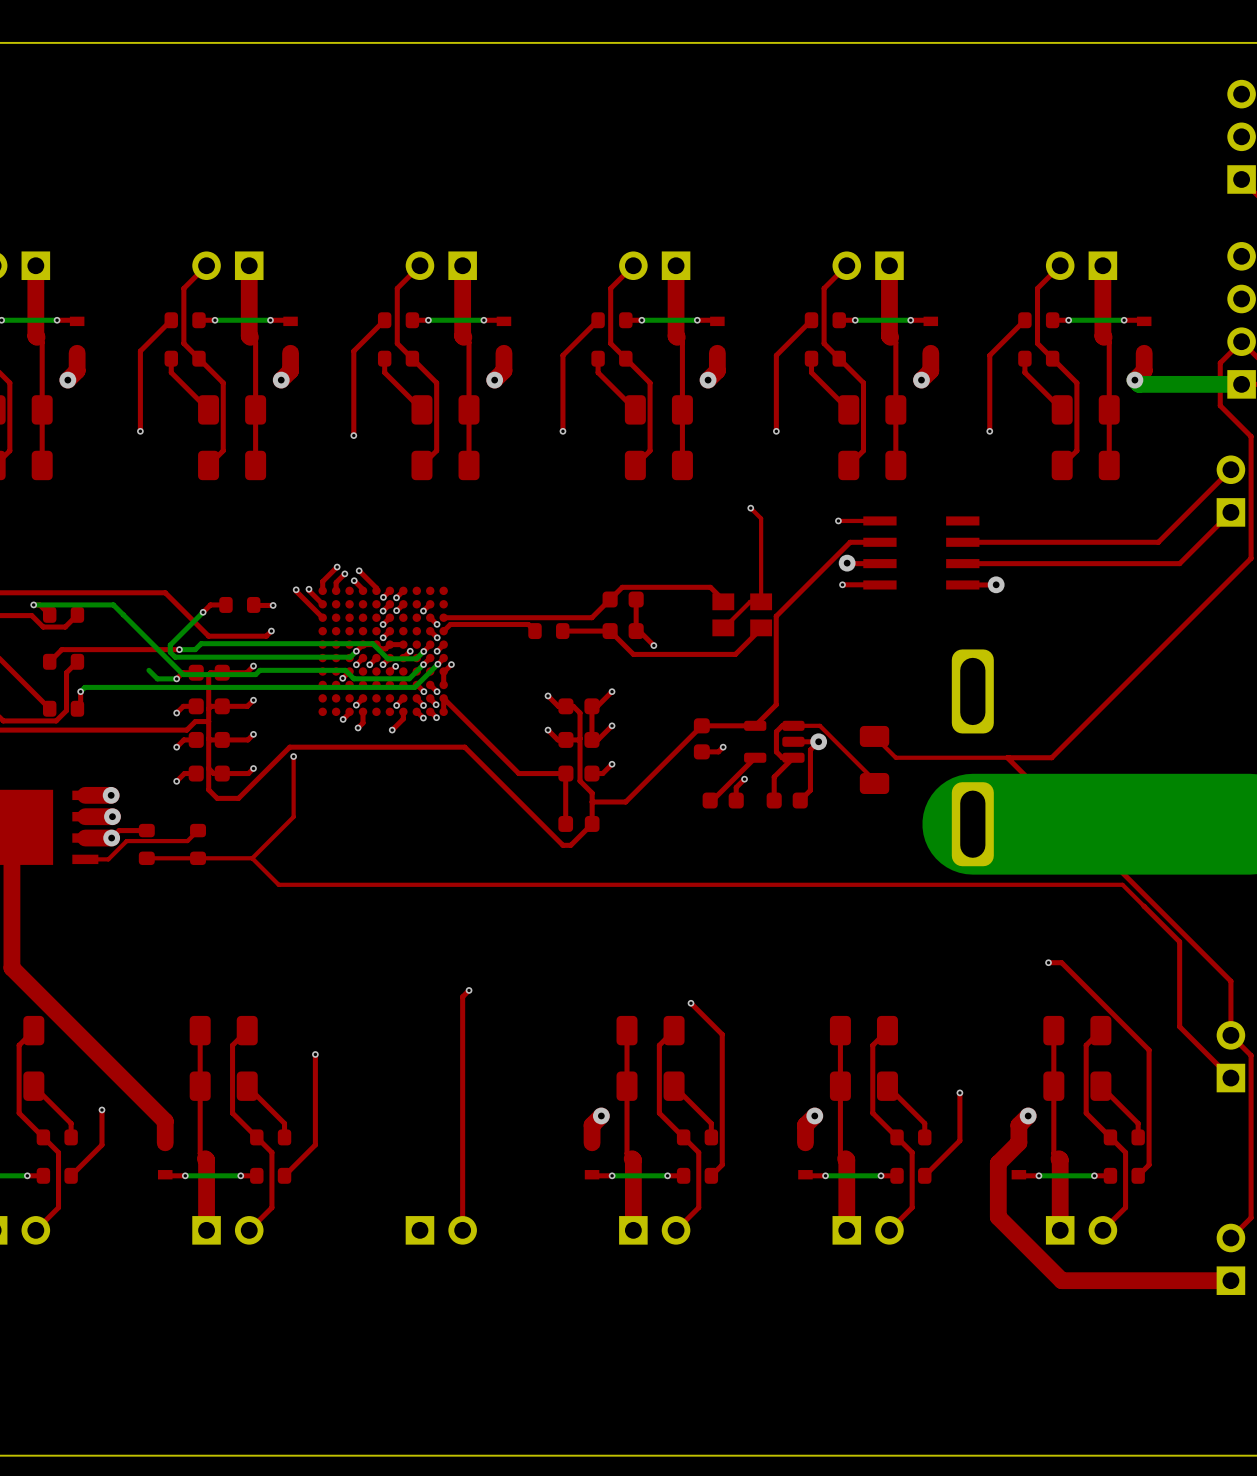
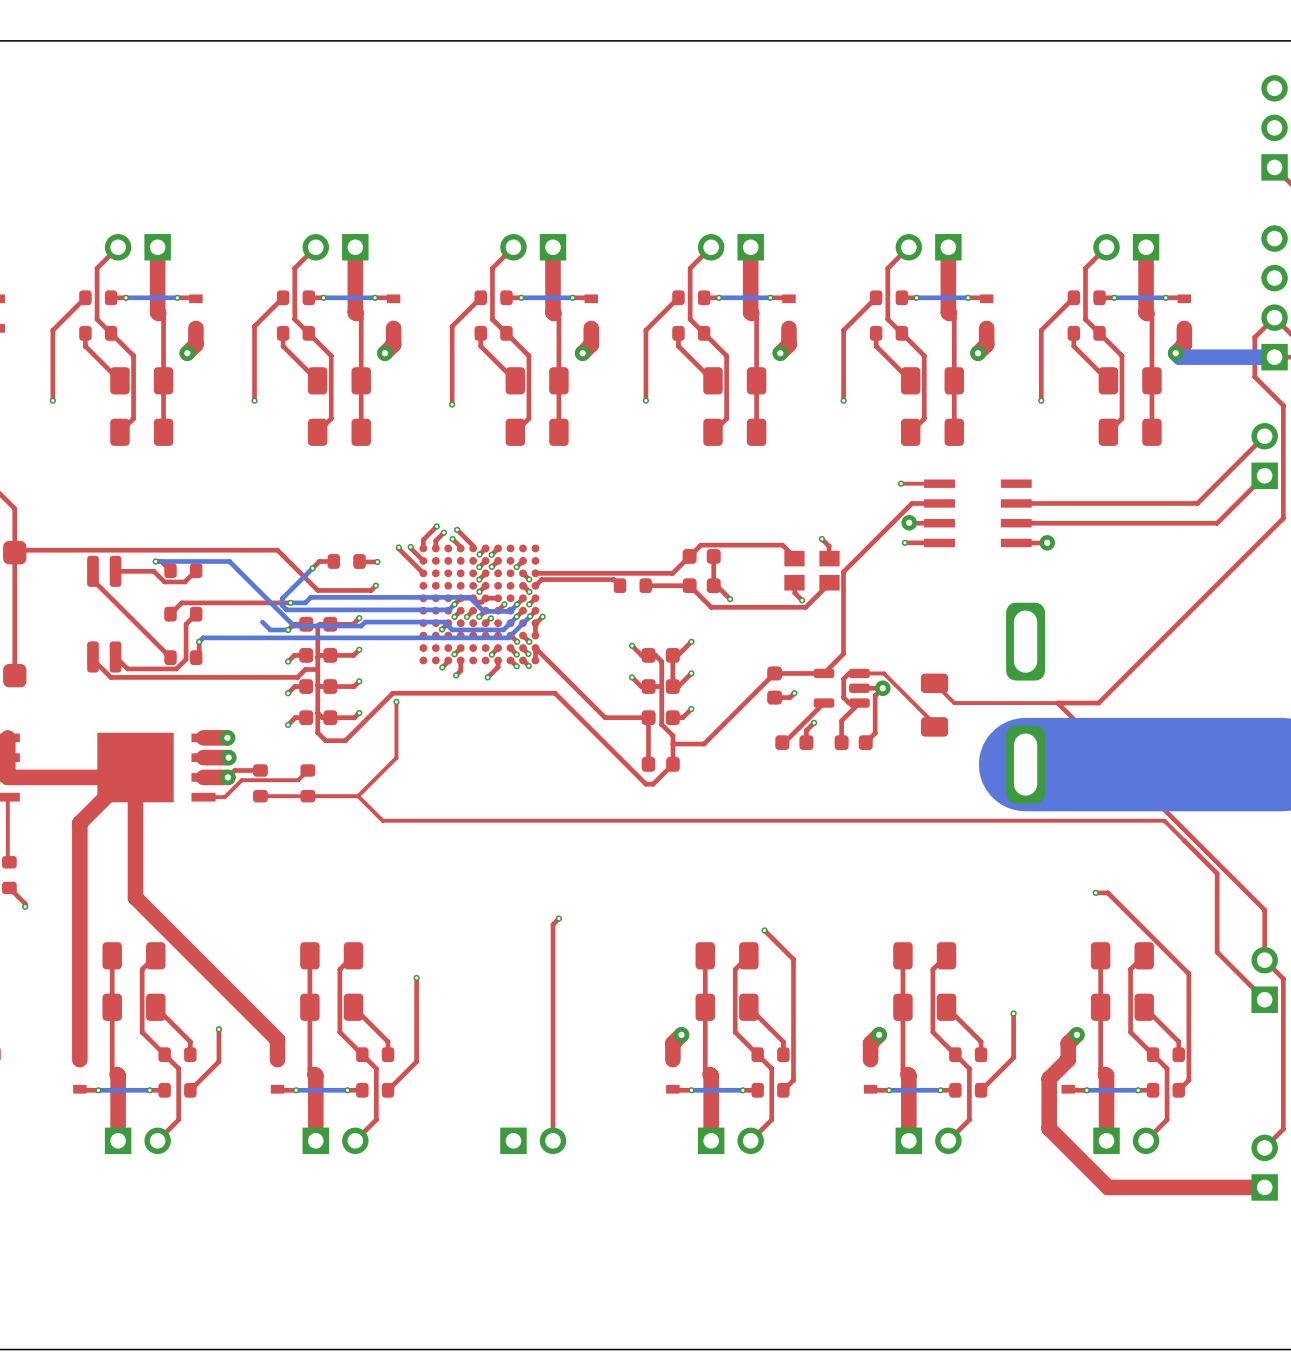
top track: (750, 508) (761, 518) (761, 601) (750, 601) (723, 627) -> none
via: (750, 508) -> none
top track: none -> (821, 539) (829, 546) (829, 557)
via: none -> (821, 539)
top track: none -> (794, 583) (794, 593) (802, 600)
via: none -> (802, 600)

